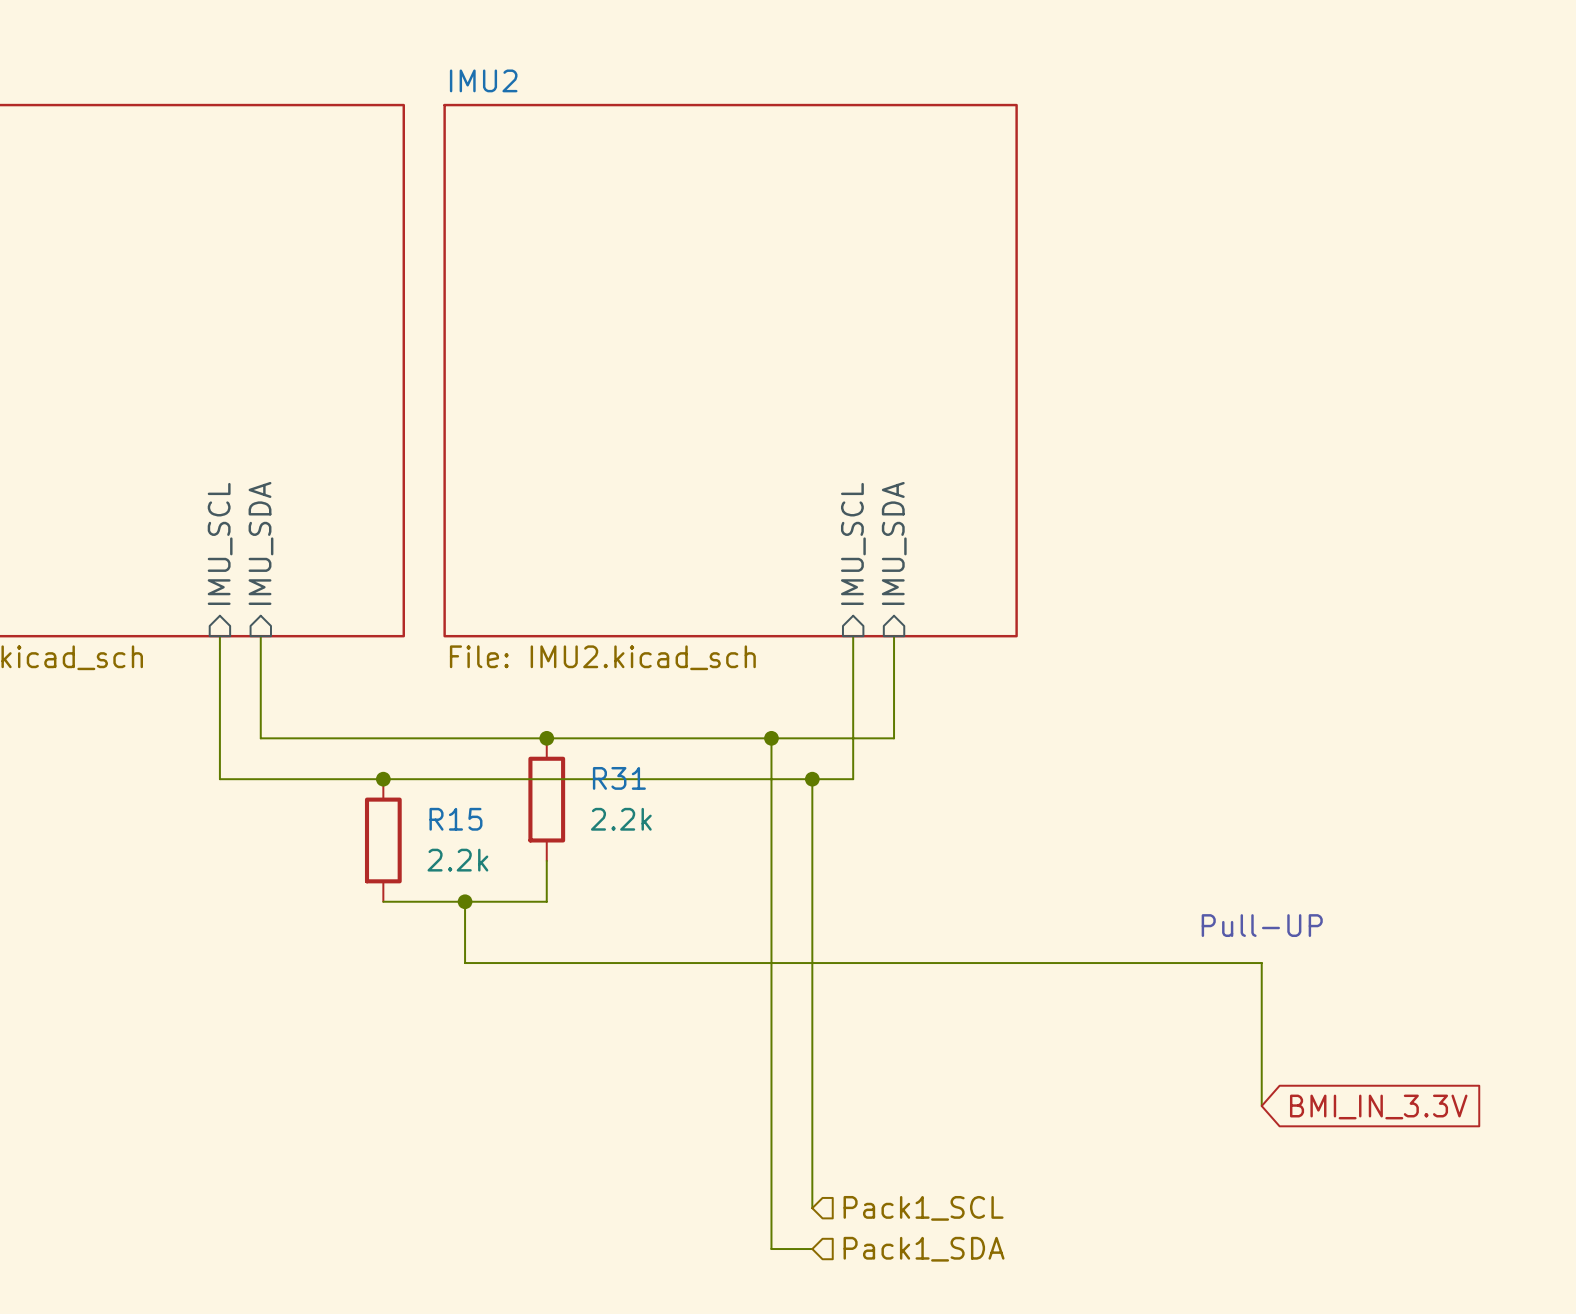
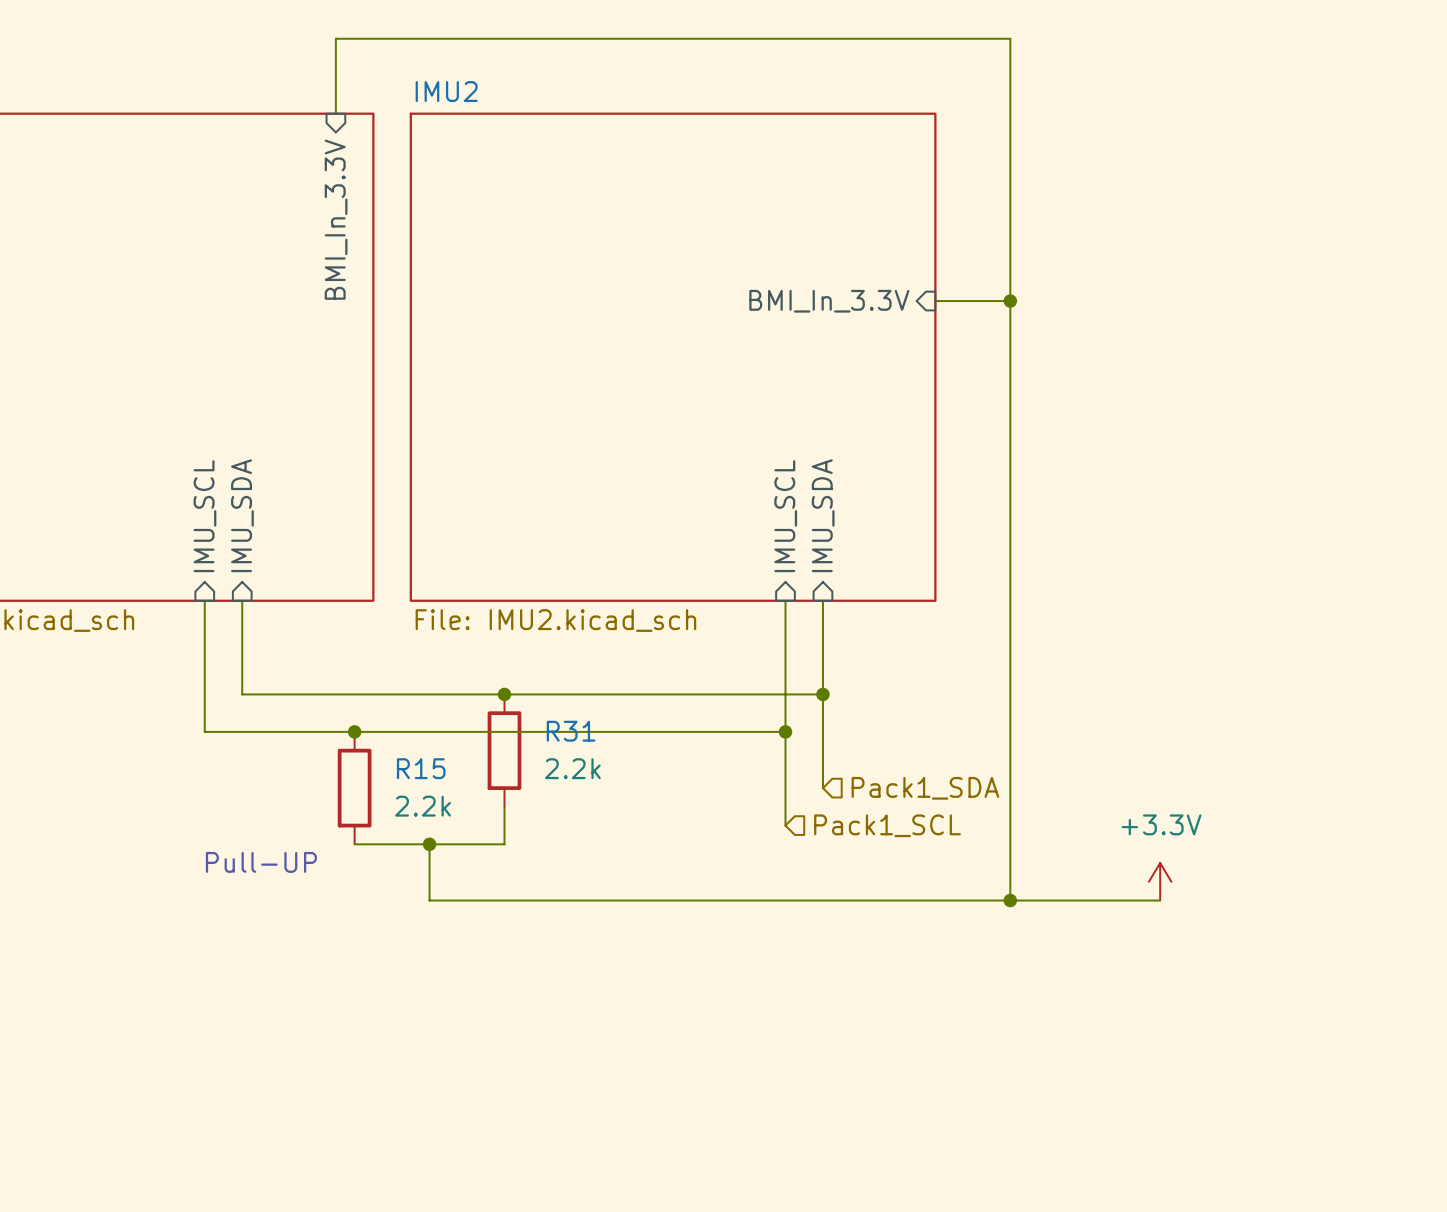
wire: none -> (335, 113) (335, 38) (1010, 38) (1010, 900)
sheet pin: none -> BMI_In_3.3V (336, 219)
sheet pin: none -> BMI_In_3.3V (829, 301)
wire: none -> (935, 301) (1010, 301)
junction: none -> (1010, 301)
wire: (771, 738) (771, 1249) (812, 1249) -> none
junction: (771, 738) -> none
wire: none -> (822, 694) (822, 788)
junction: none -> (822, 694)
wire: (812, 779) (812, 1208) -> none
junction position: (812, 779) -> (785, 731)
wire: none -> (785, 731) (785, 825)
hierarchical label: none -> Pack1_SDA (925, 788)
text: none -> Pull-UP (261, 862)
text: Pull-UP (1262, 925) -> none
power symbol: none -> +3.3V (1160, 881)
junction: none -> (1010, 900)
wire: (1261, 963) (1261, 1106) -> none
global label: BMI_IN_3.3V (1378, 1107) -> none
hierarchical label position: Pack1_SCL (923, 1208) -> Pack1_SCL (887, 825)
hierarchical label: Pack1_SDA (924, 1249) -> none

